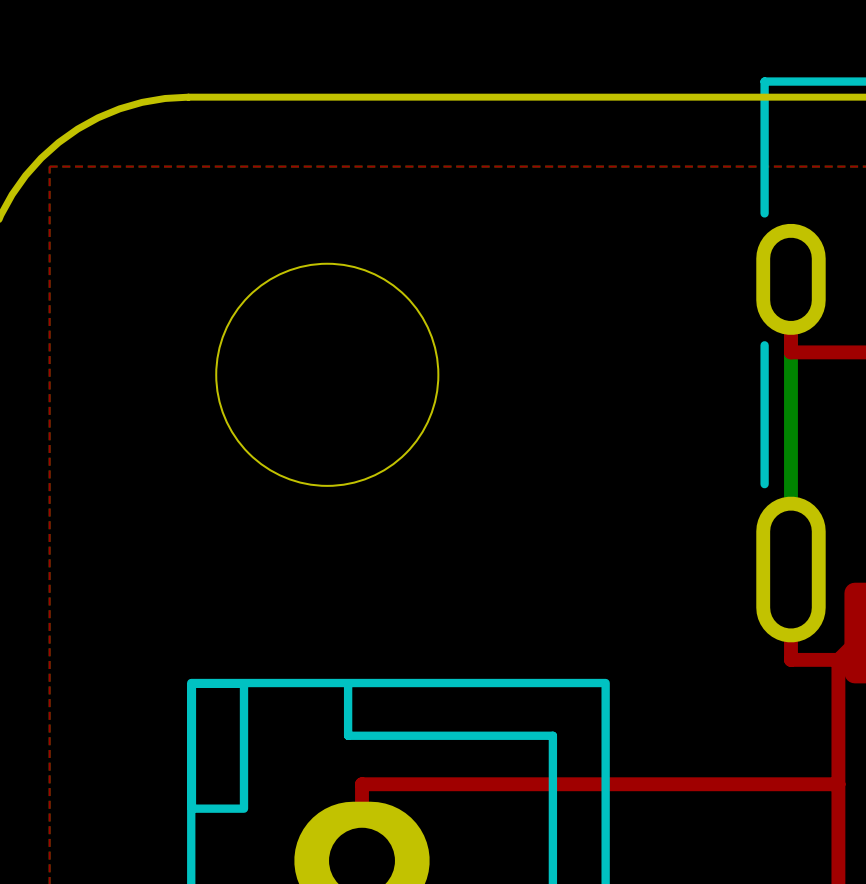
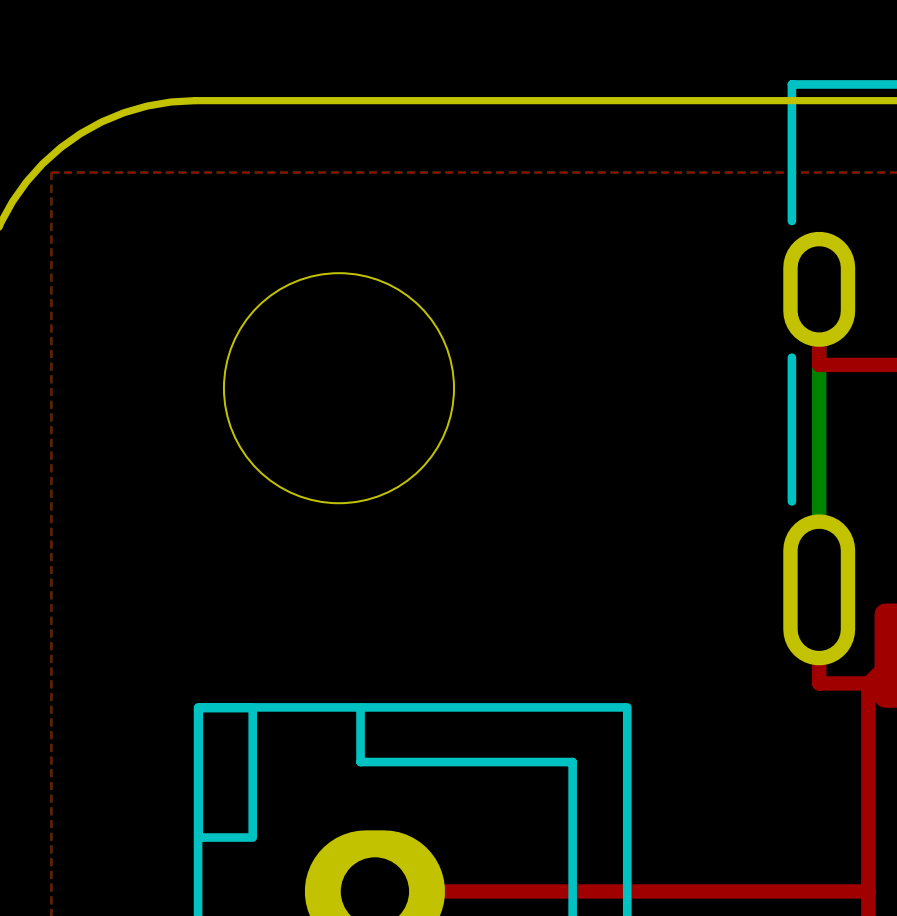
top track: (838, 784) (362, 784) (362, 860) -> (868, 891) (374, 891)

